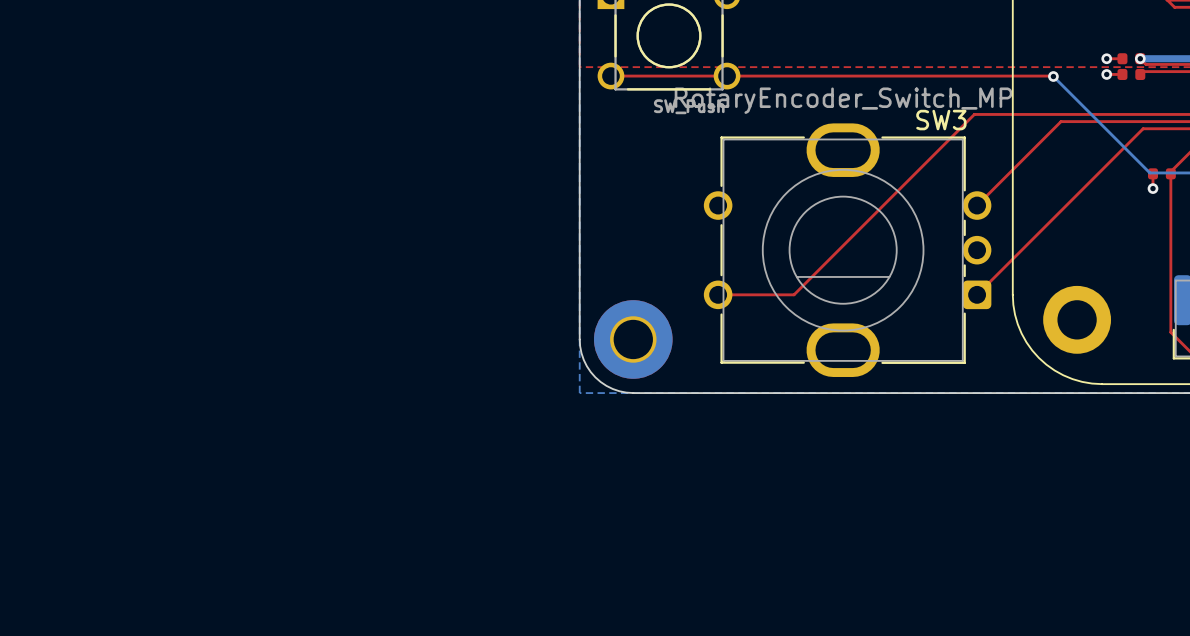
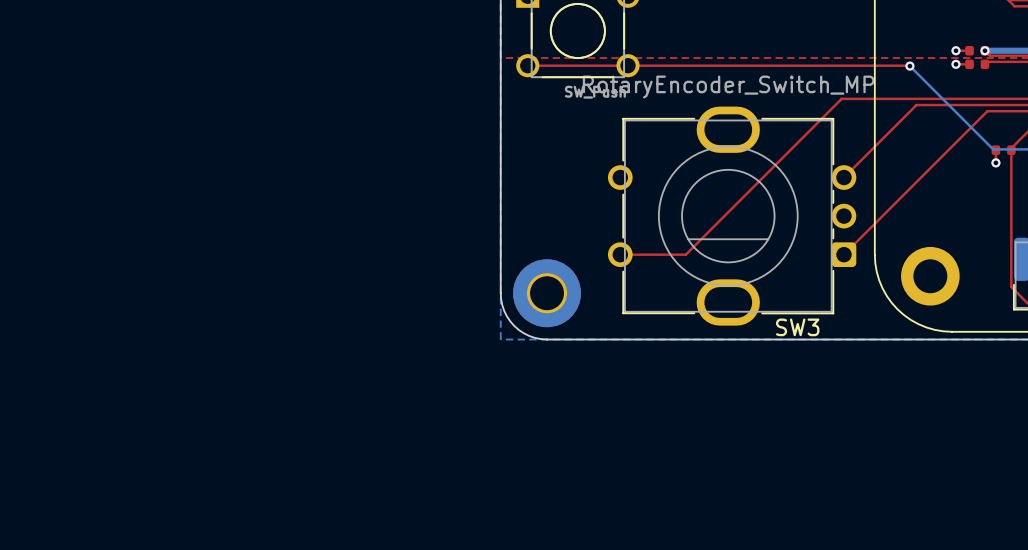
SW3 name position: SW3 (941, 120) -> SW3 (797, 327)

